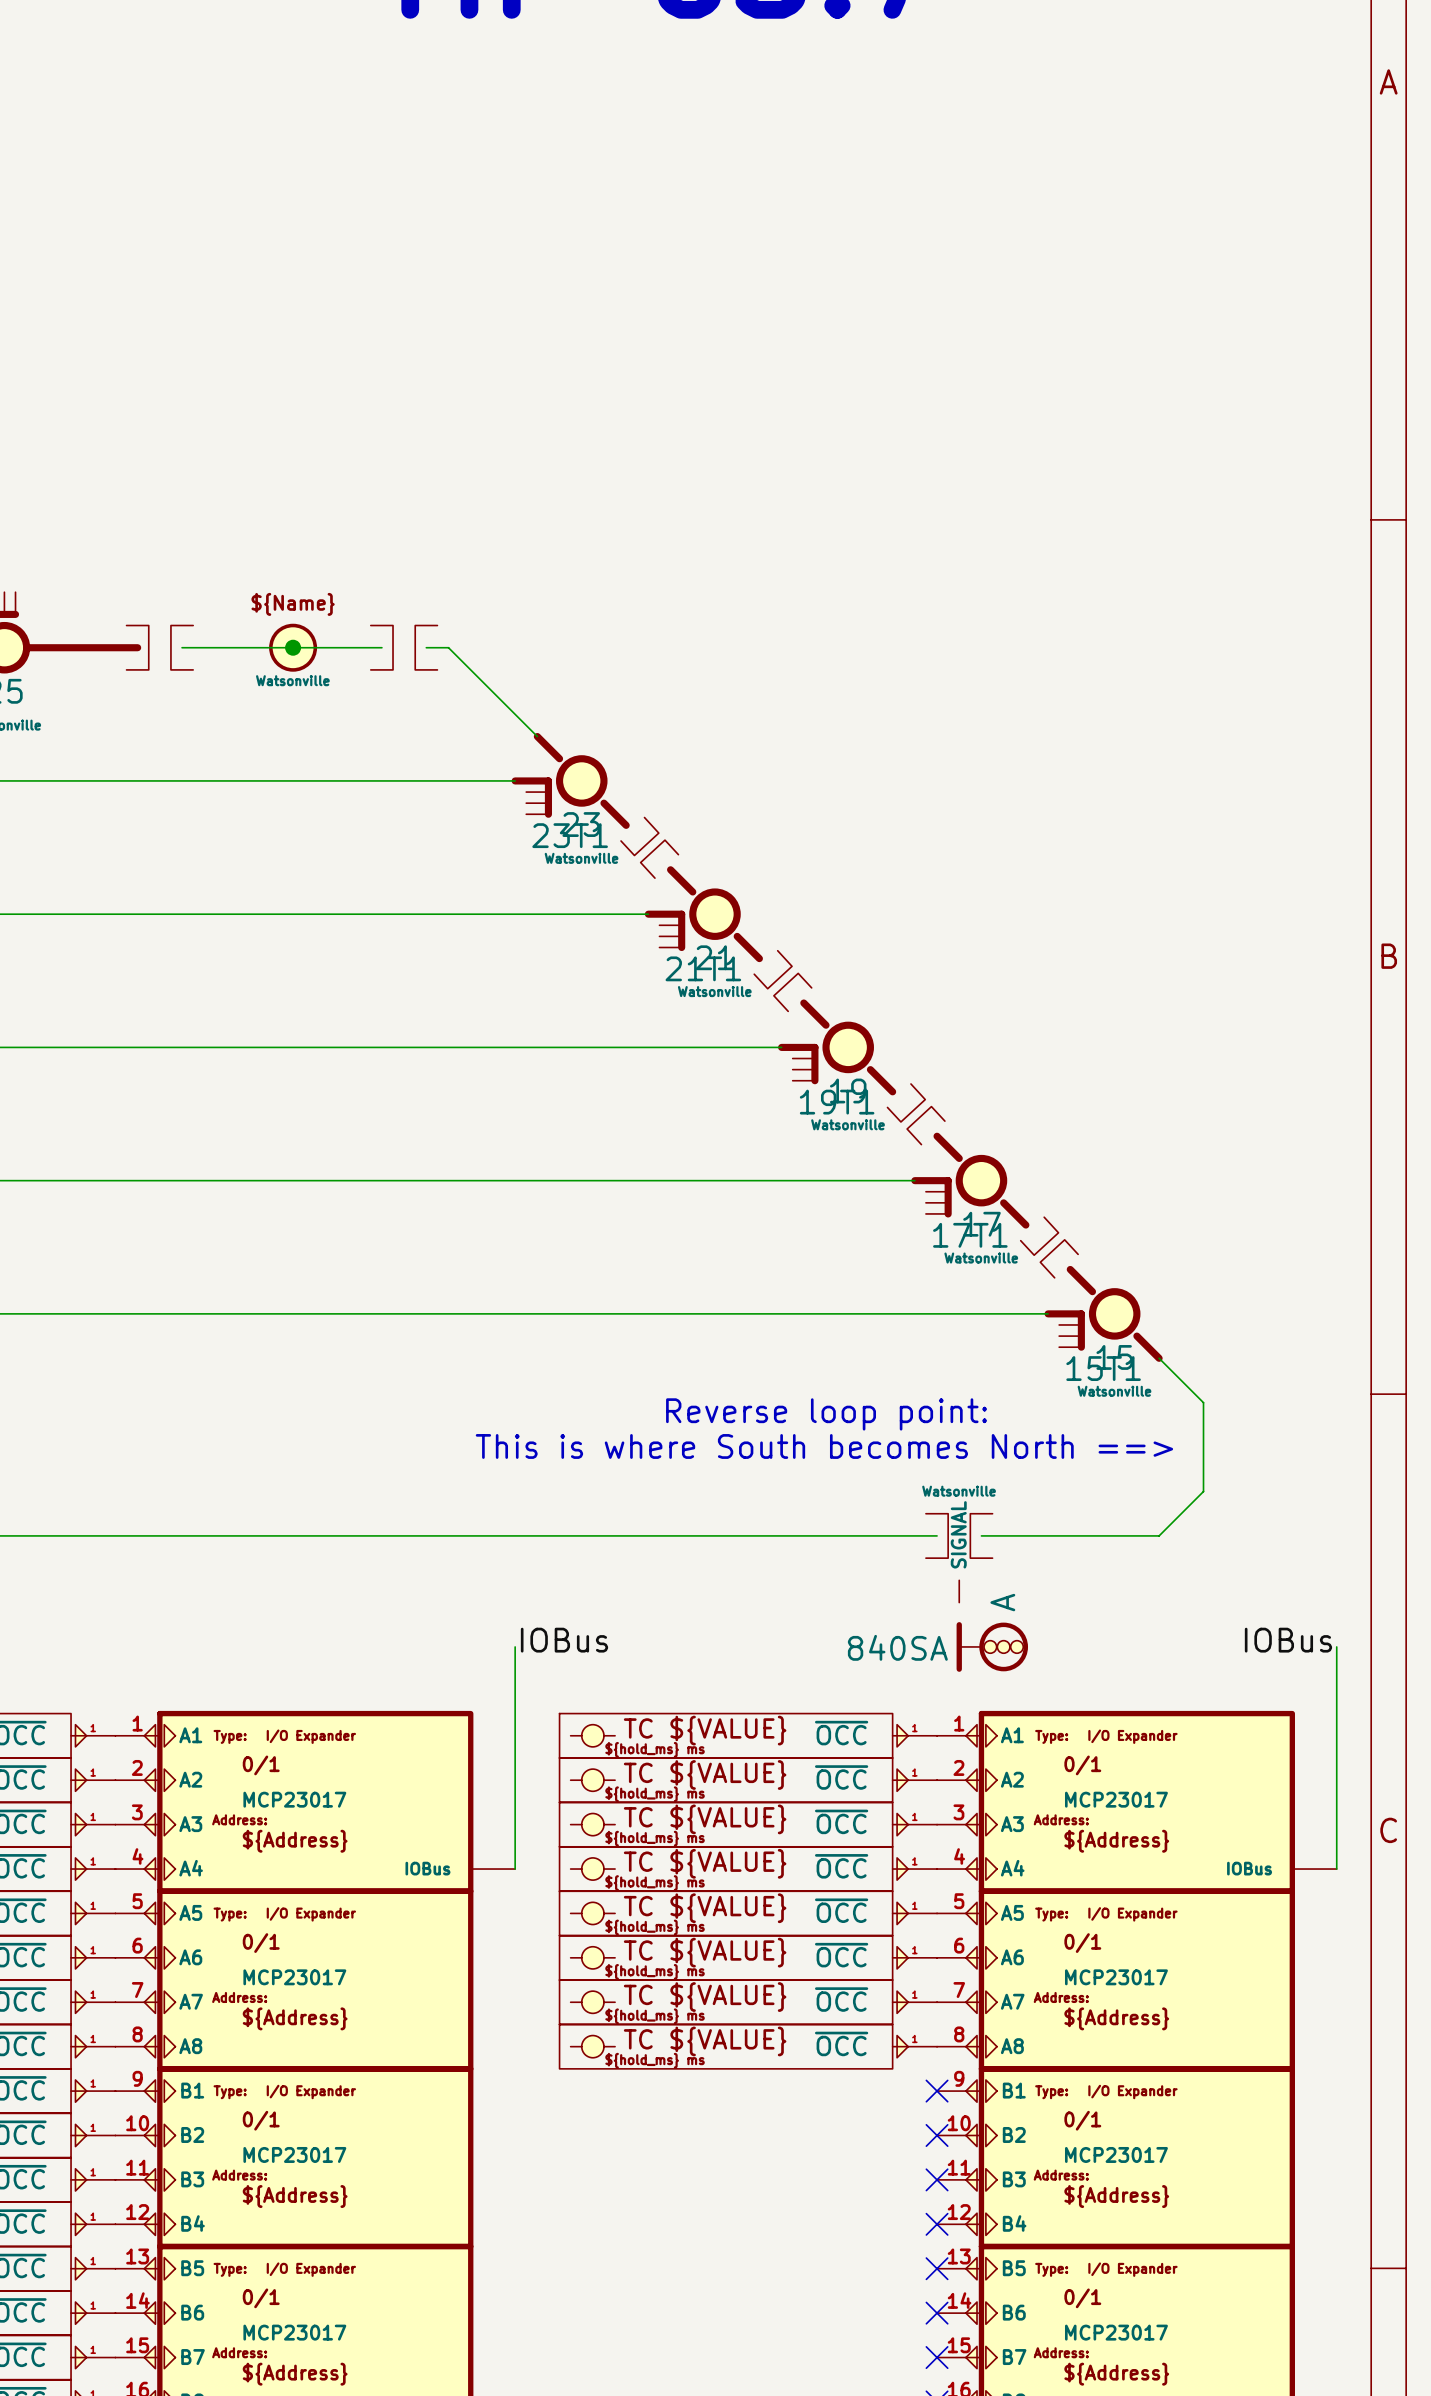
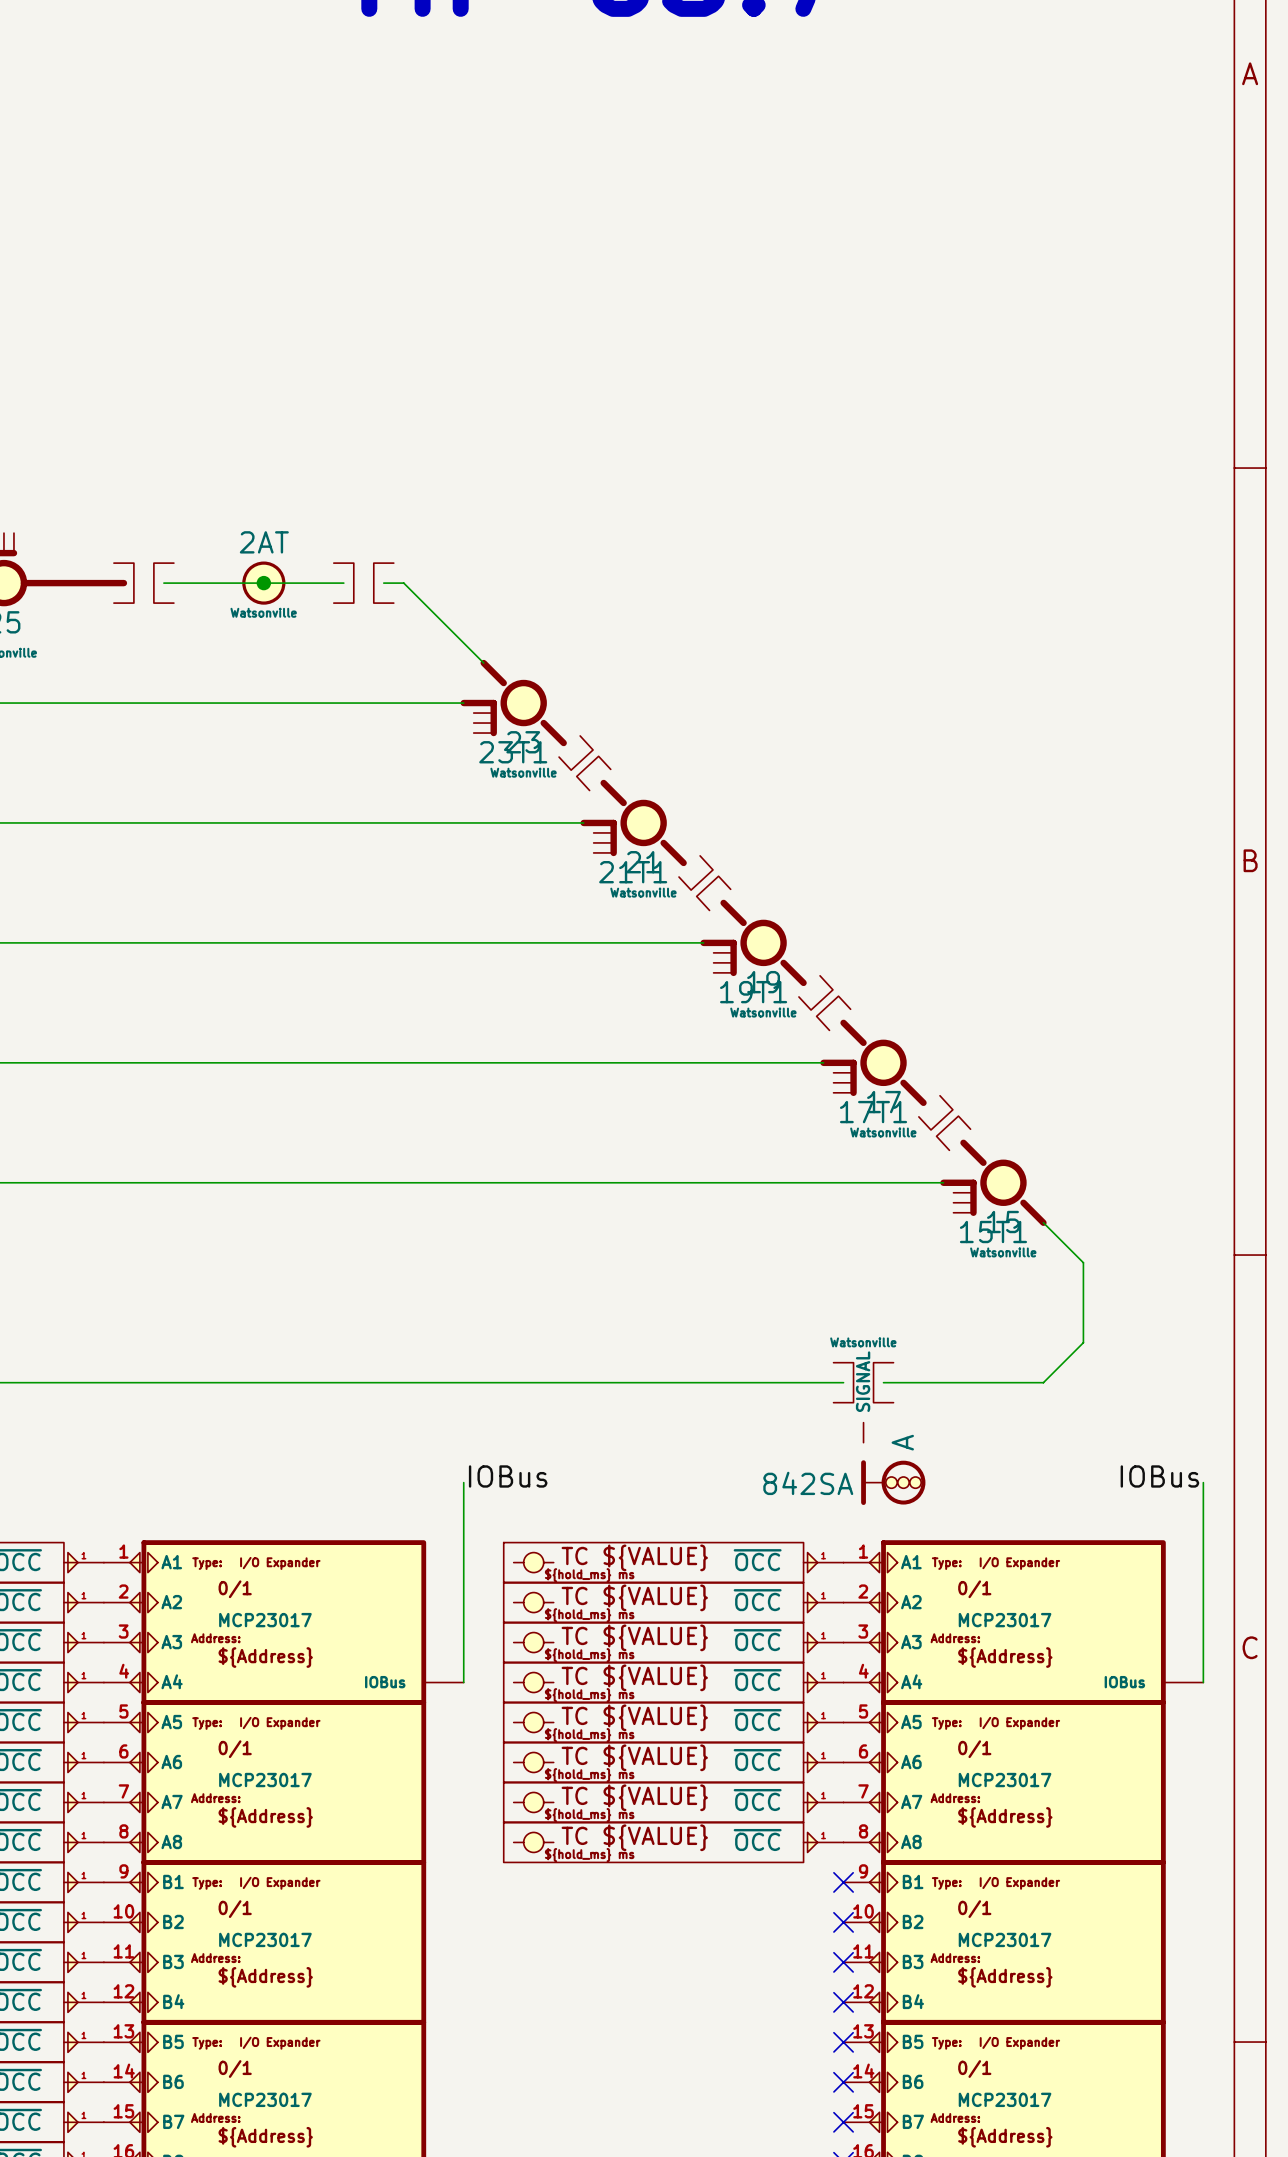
part value: none -> 2AT (264, 542)
part text: ${Name} (293, 604) -> none
text: Reverse loop point: (826, 1414) -> none
text: This is where South becomes North ==> (824, 1446) -> none
part value: 840SA (897, 1647) -> 842SA (808, 1483)

